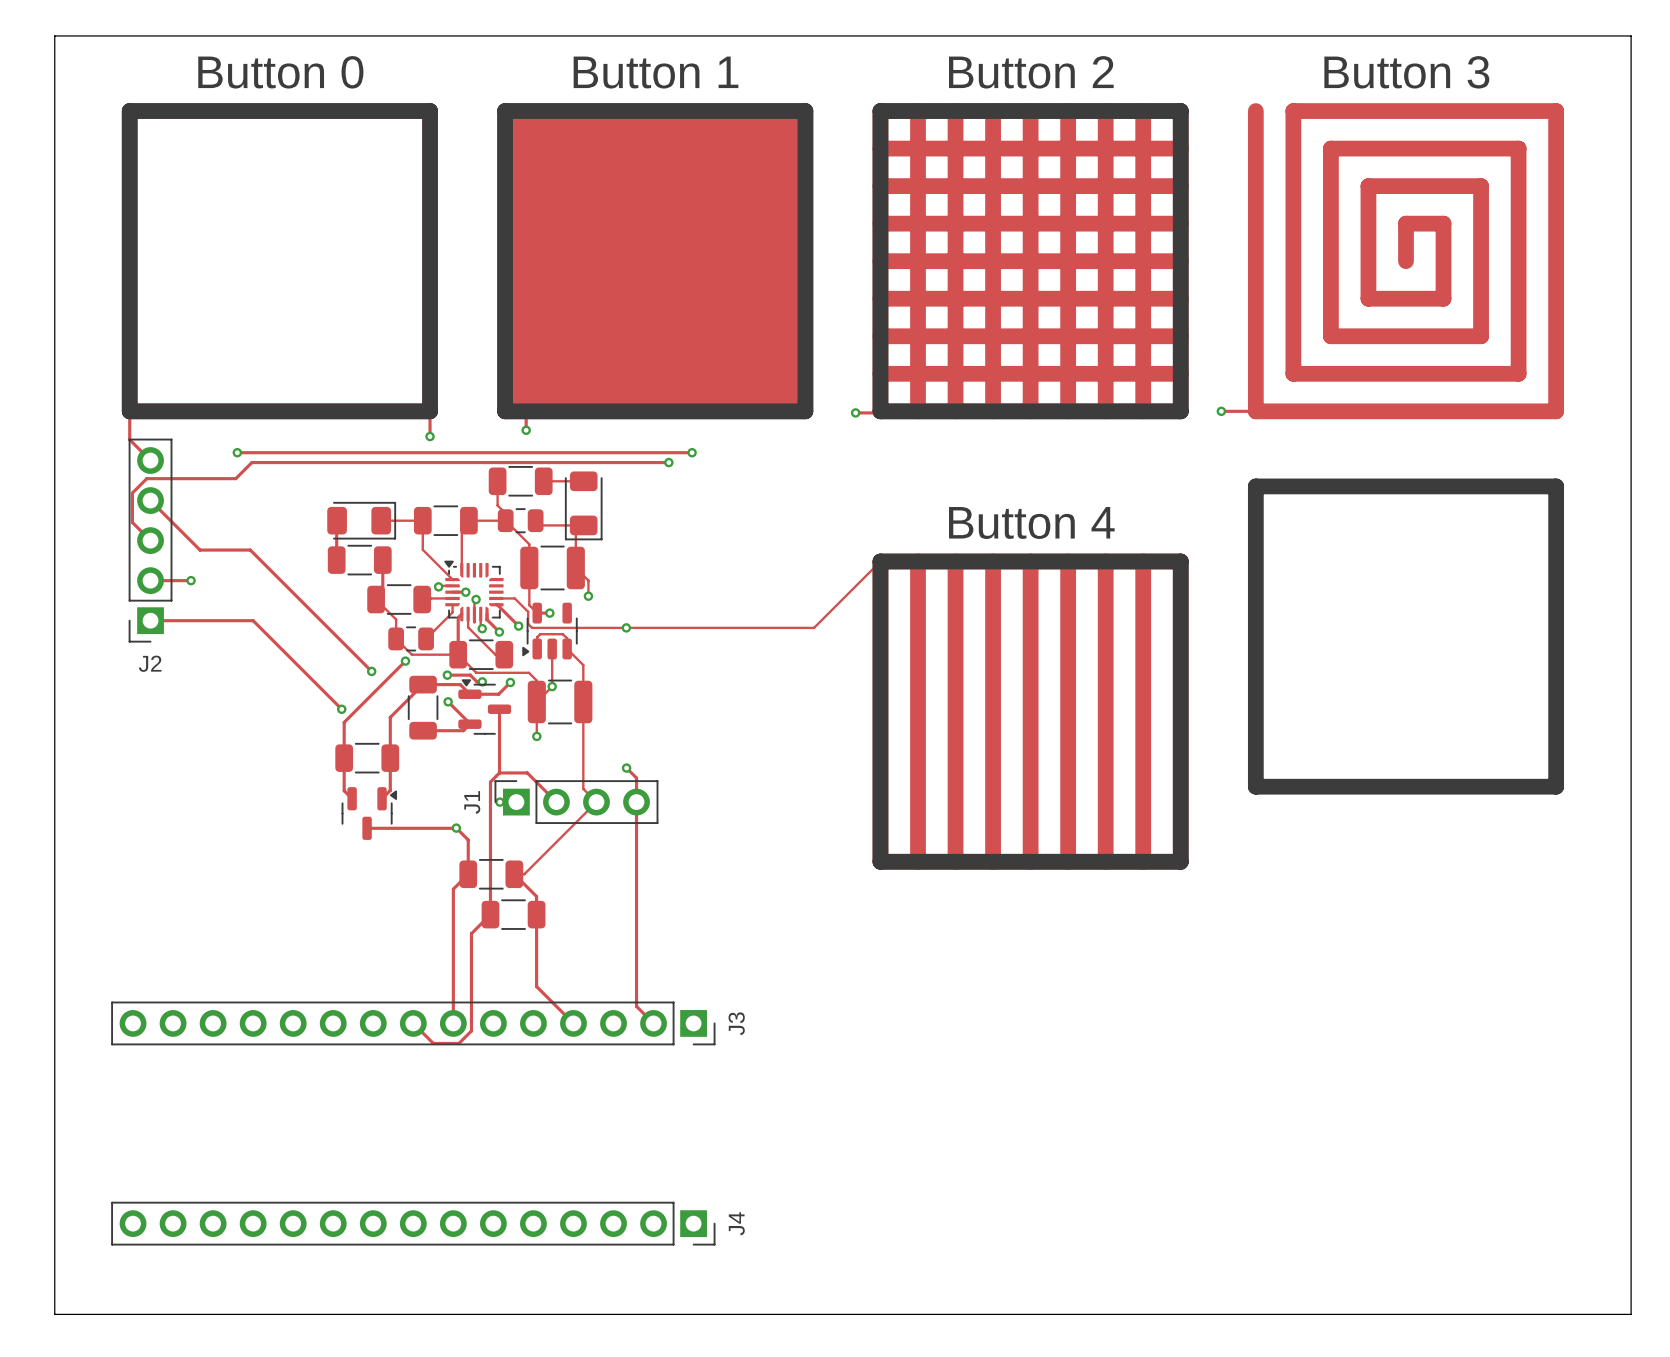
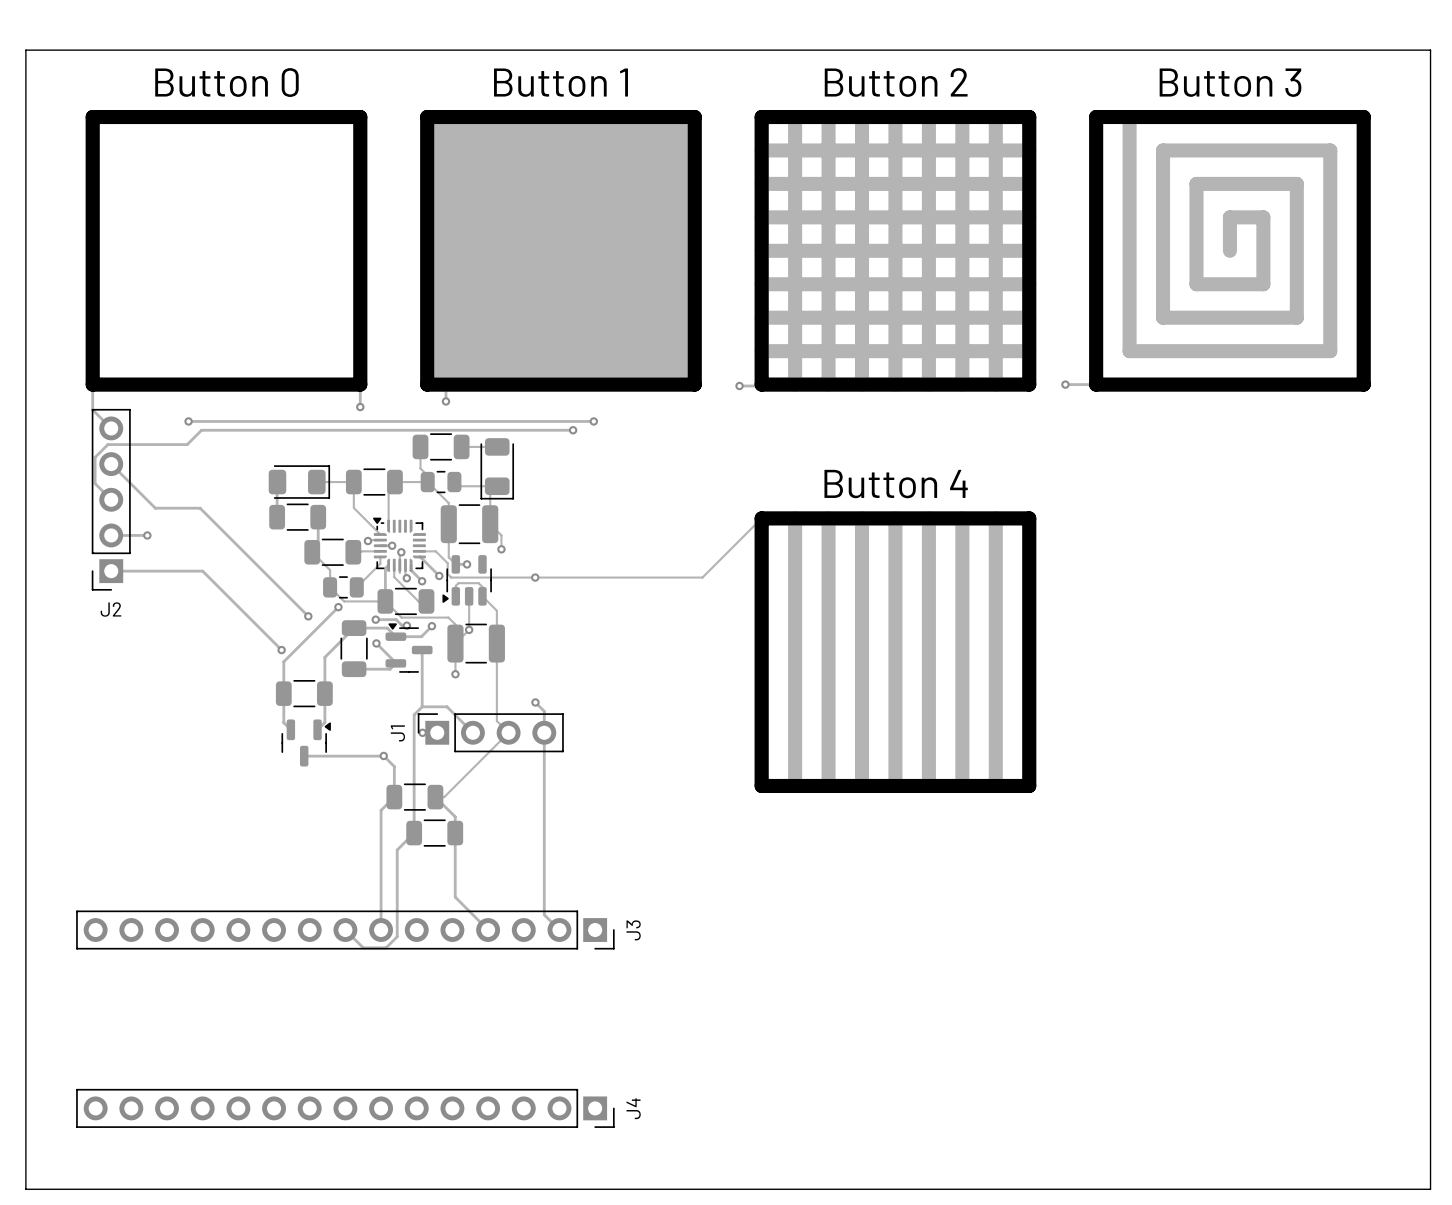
line: (1255, 486) (1556, 486) (1556, 786) (1255, 786) (1255, 486) -> (1096, 117) (1363, 117) (1363, 384) (1096, 384) (1096, 117)

